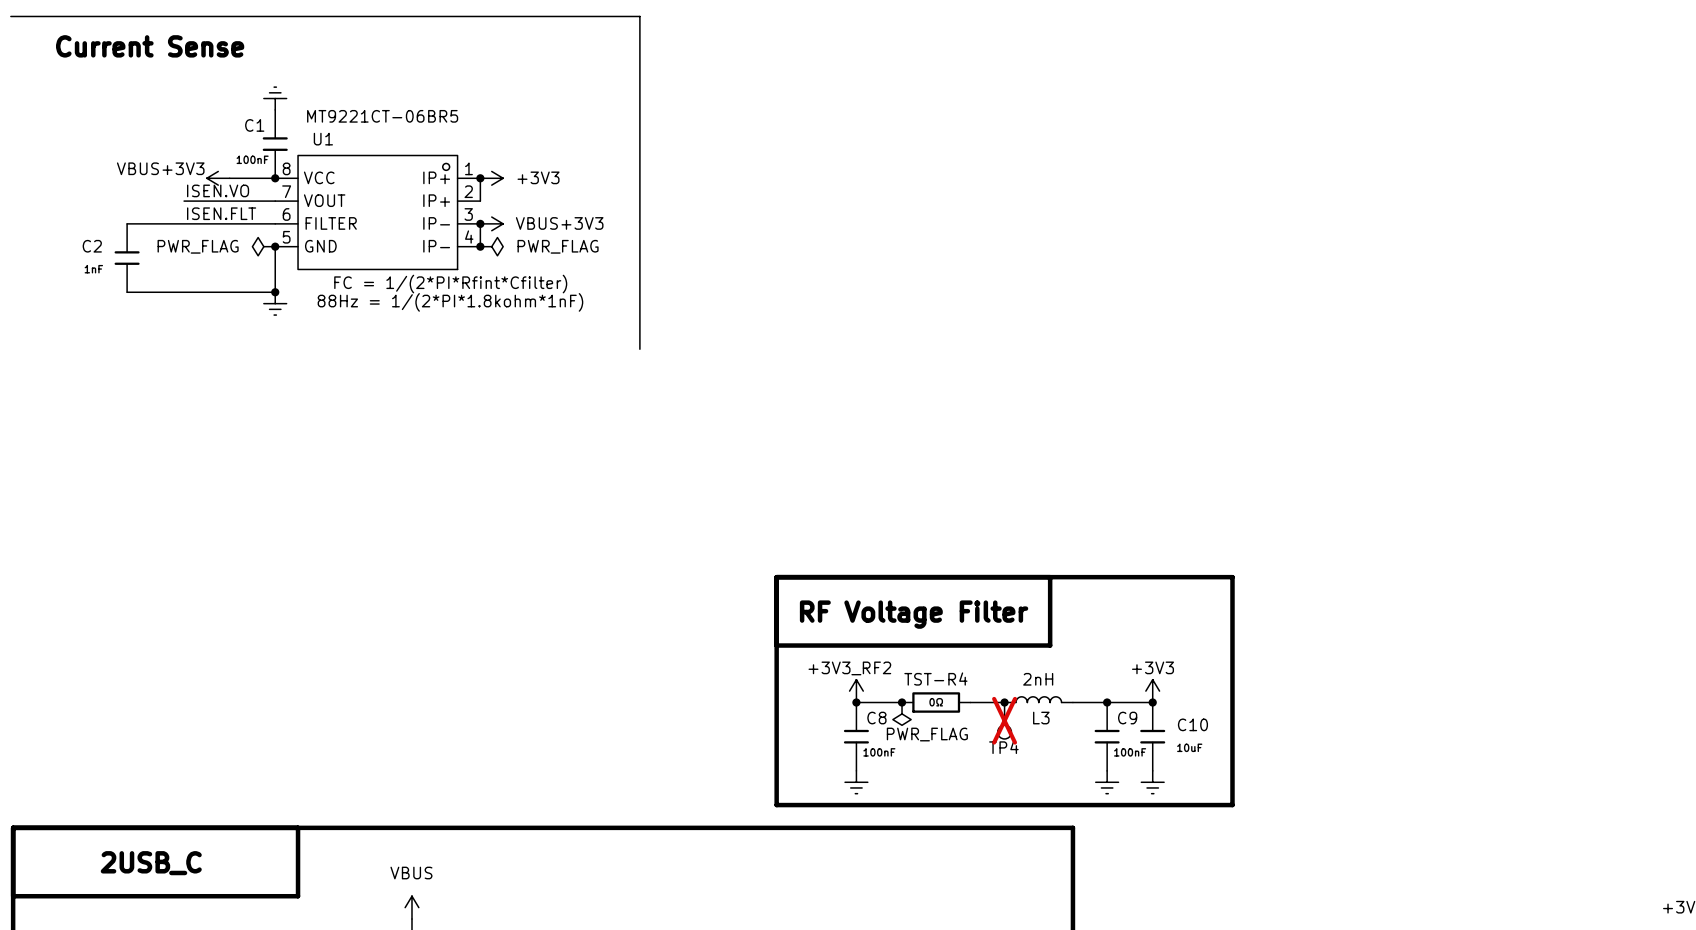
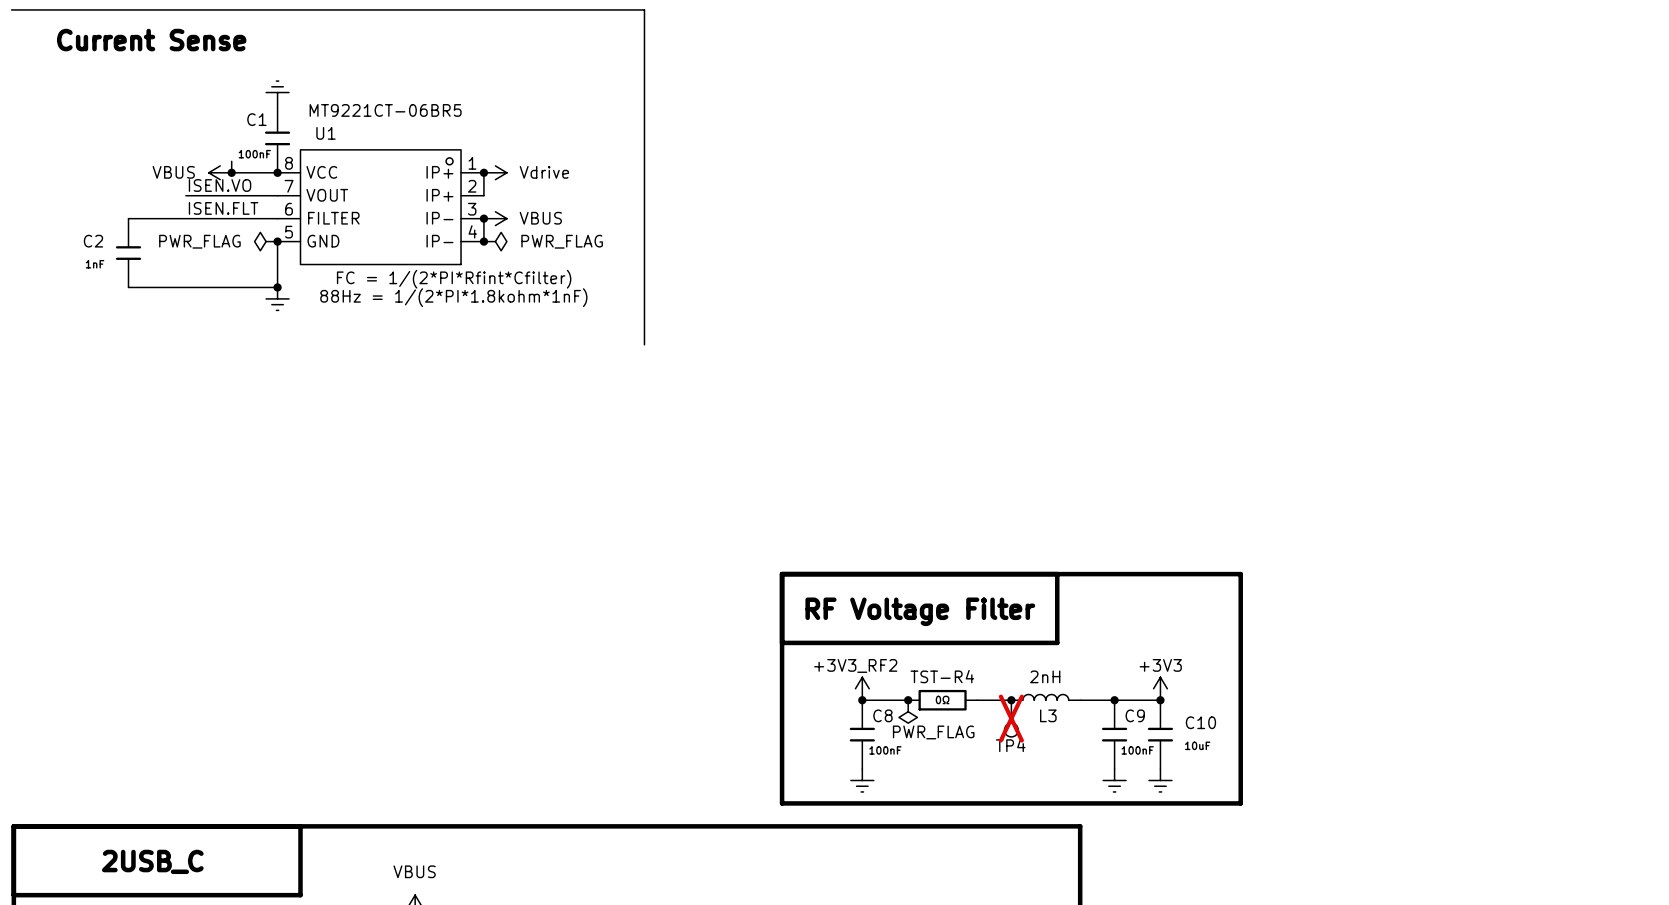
wire: none -> (231, 161) (231, 172)
power symbol: VBUS+3V3 (218, 178) -> VBUS (220, 172)
junction: none -> (231, 172)
power symbol: +3V3 (491, 178) -> Vdrive (495, 172)
power symbol: VBUS+3V3 (491, 223) -> VBUS (495, 218)

